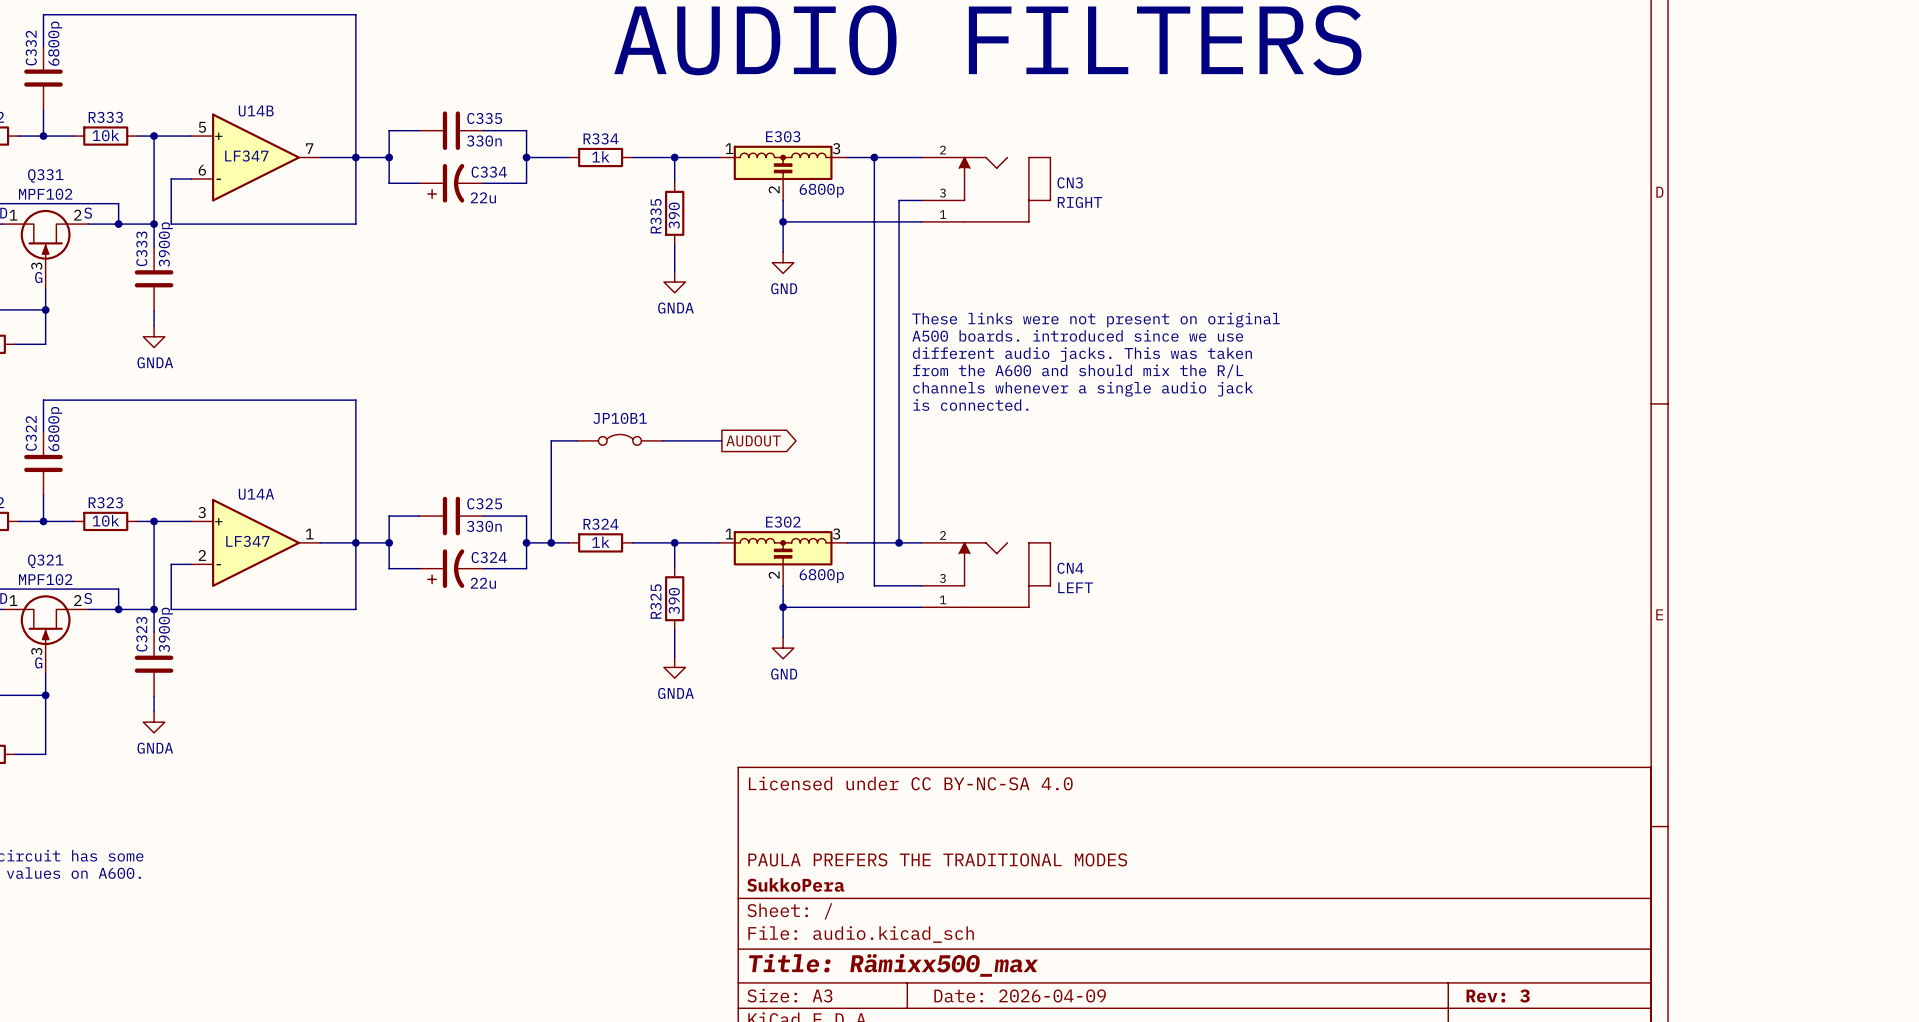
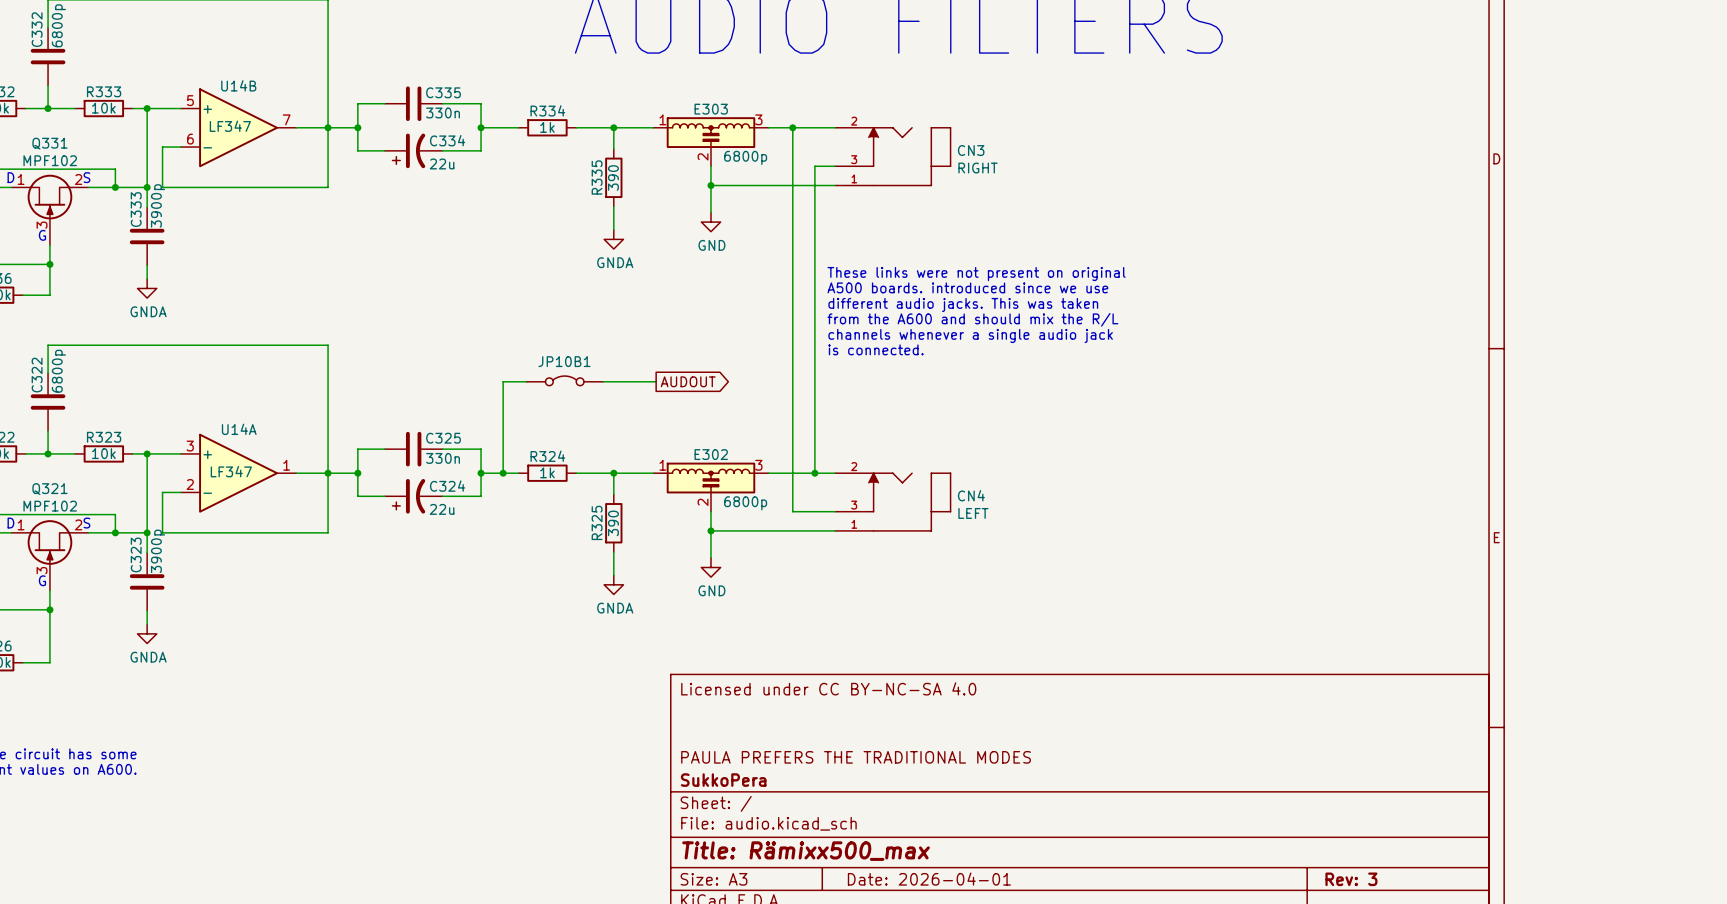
title block: Date: 2026-04-09 (1020, 995) -> Date: 2026-04-01 (929, 879)

